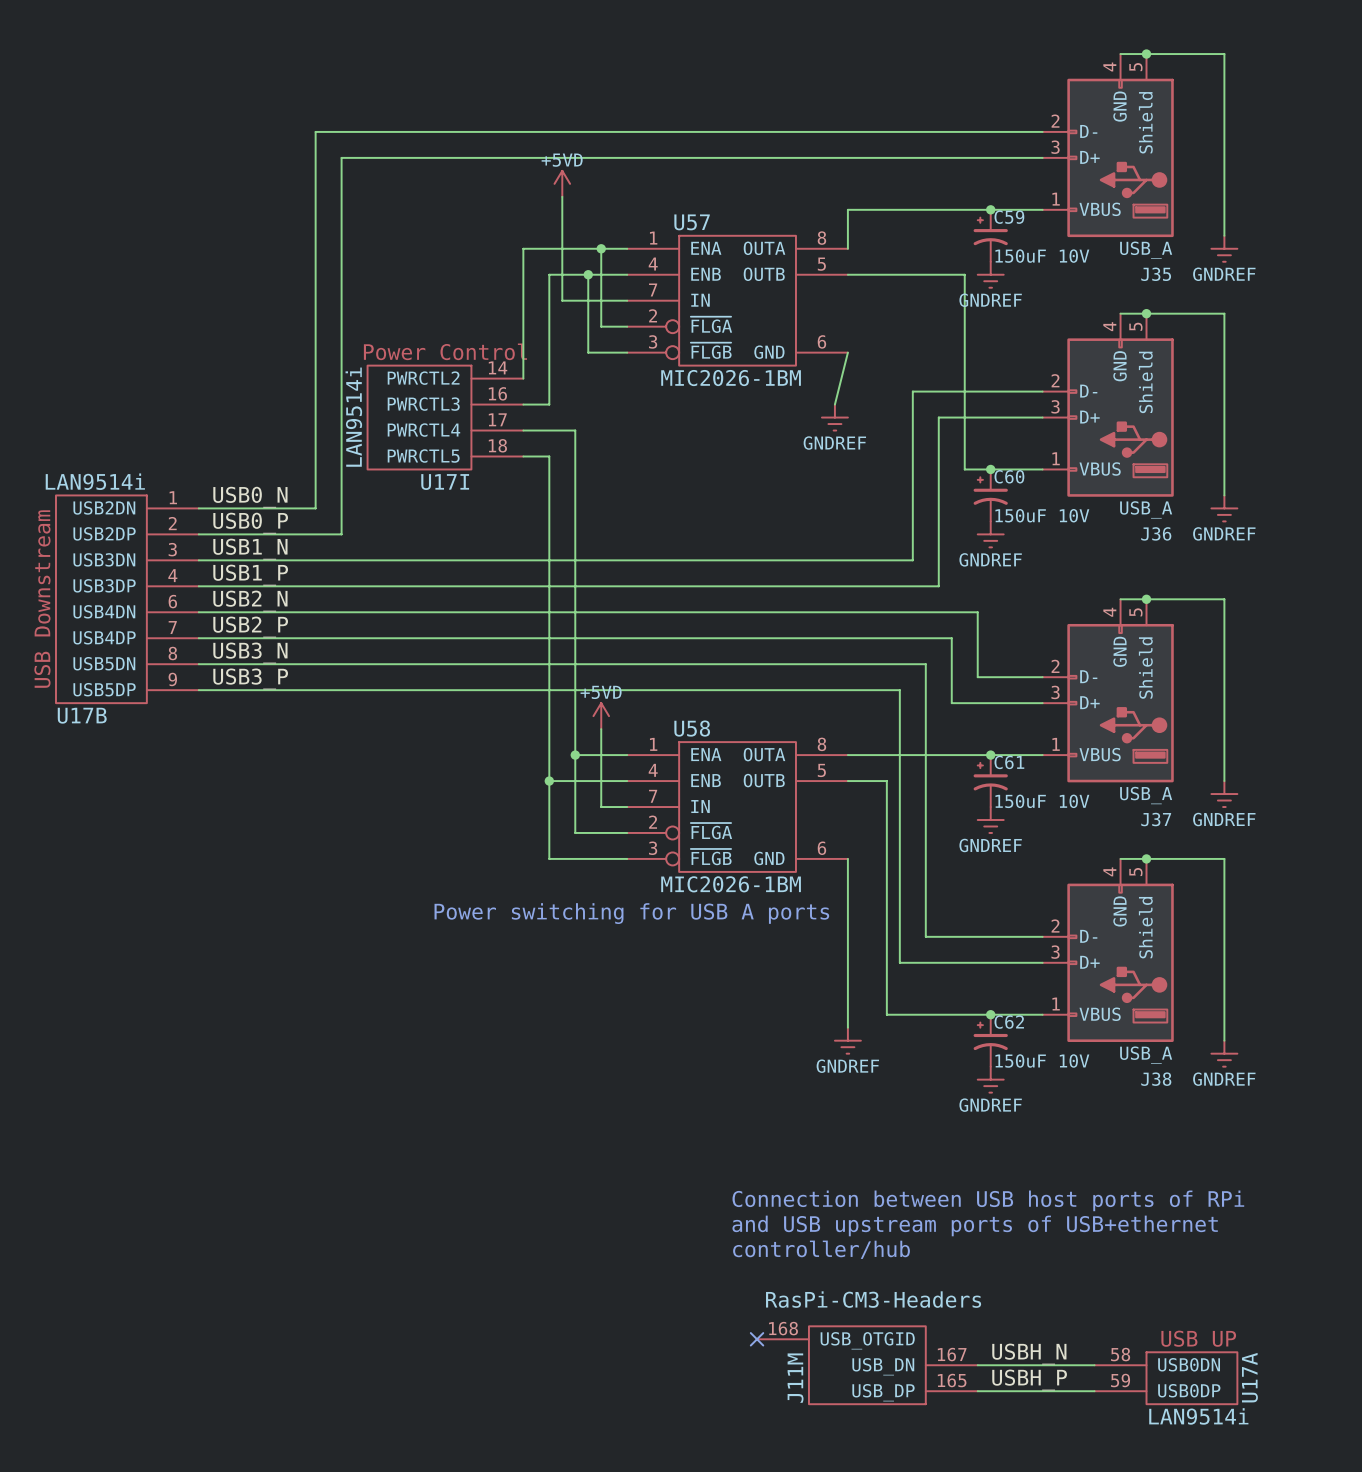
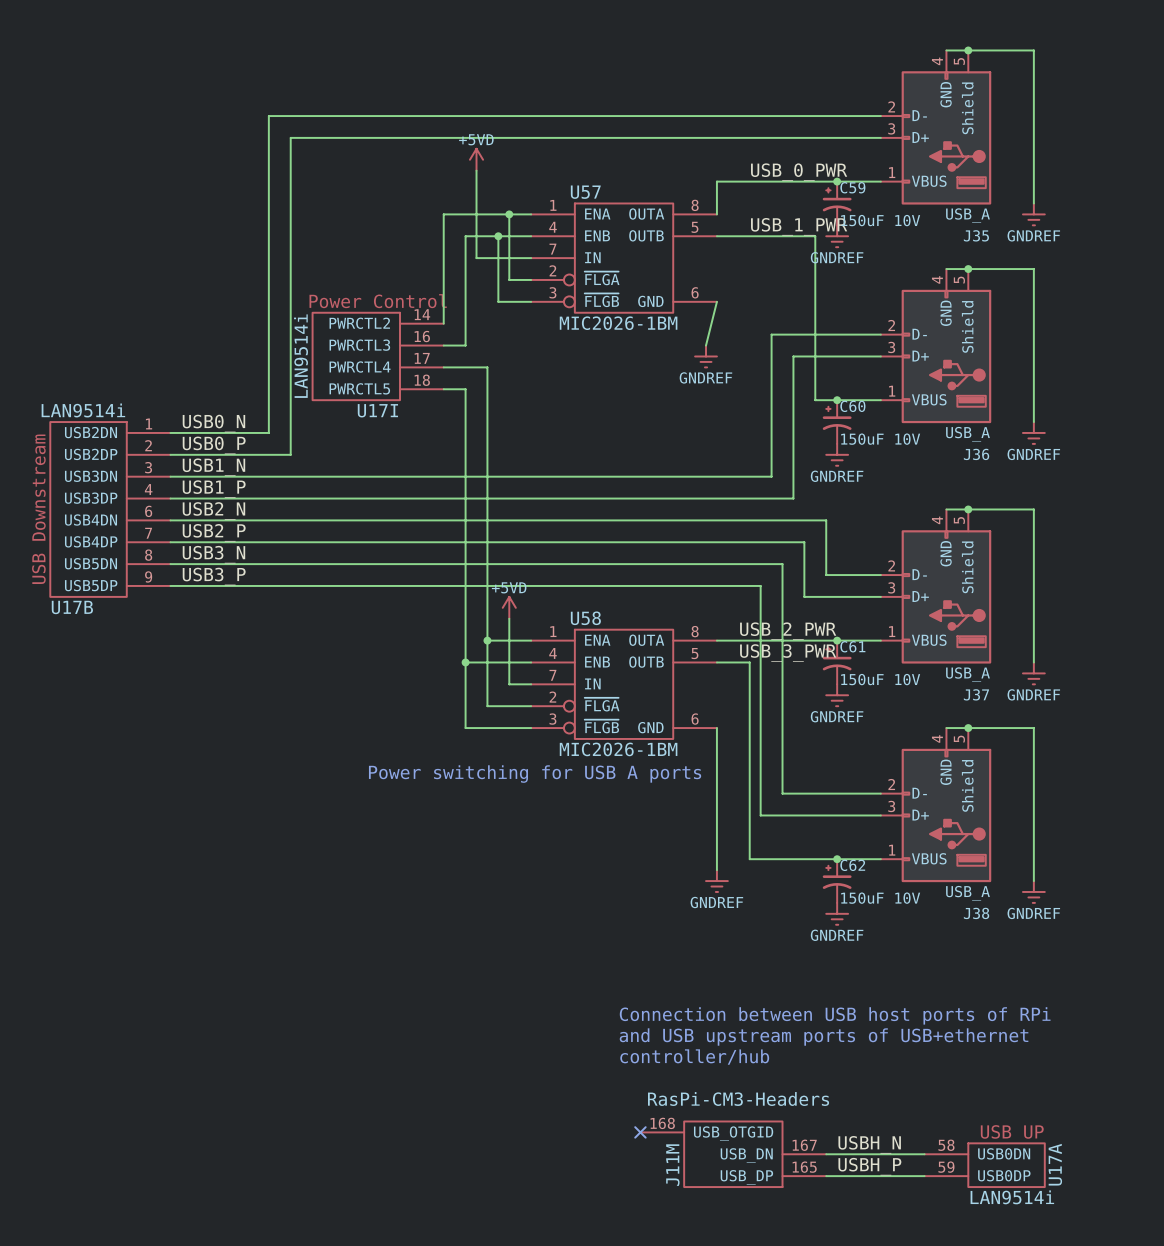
label: none -> USB_0_PWR (799, 172)
label: none -> USB_1_PWR (799, 226)
label: none -> USB_2_PWR (788, 631)
label: none -> USB_3_PWR (788, 653)

